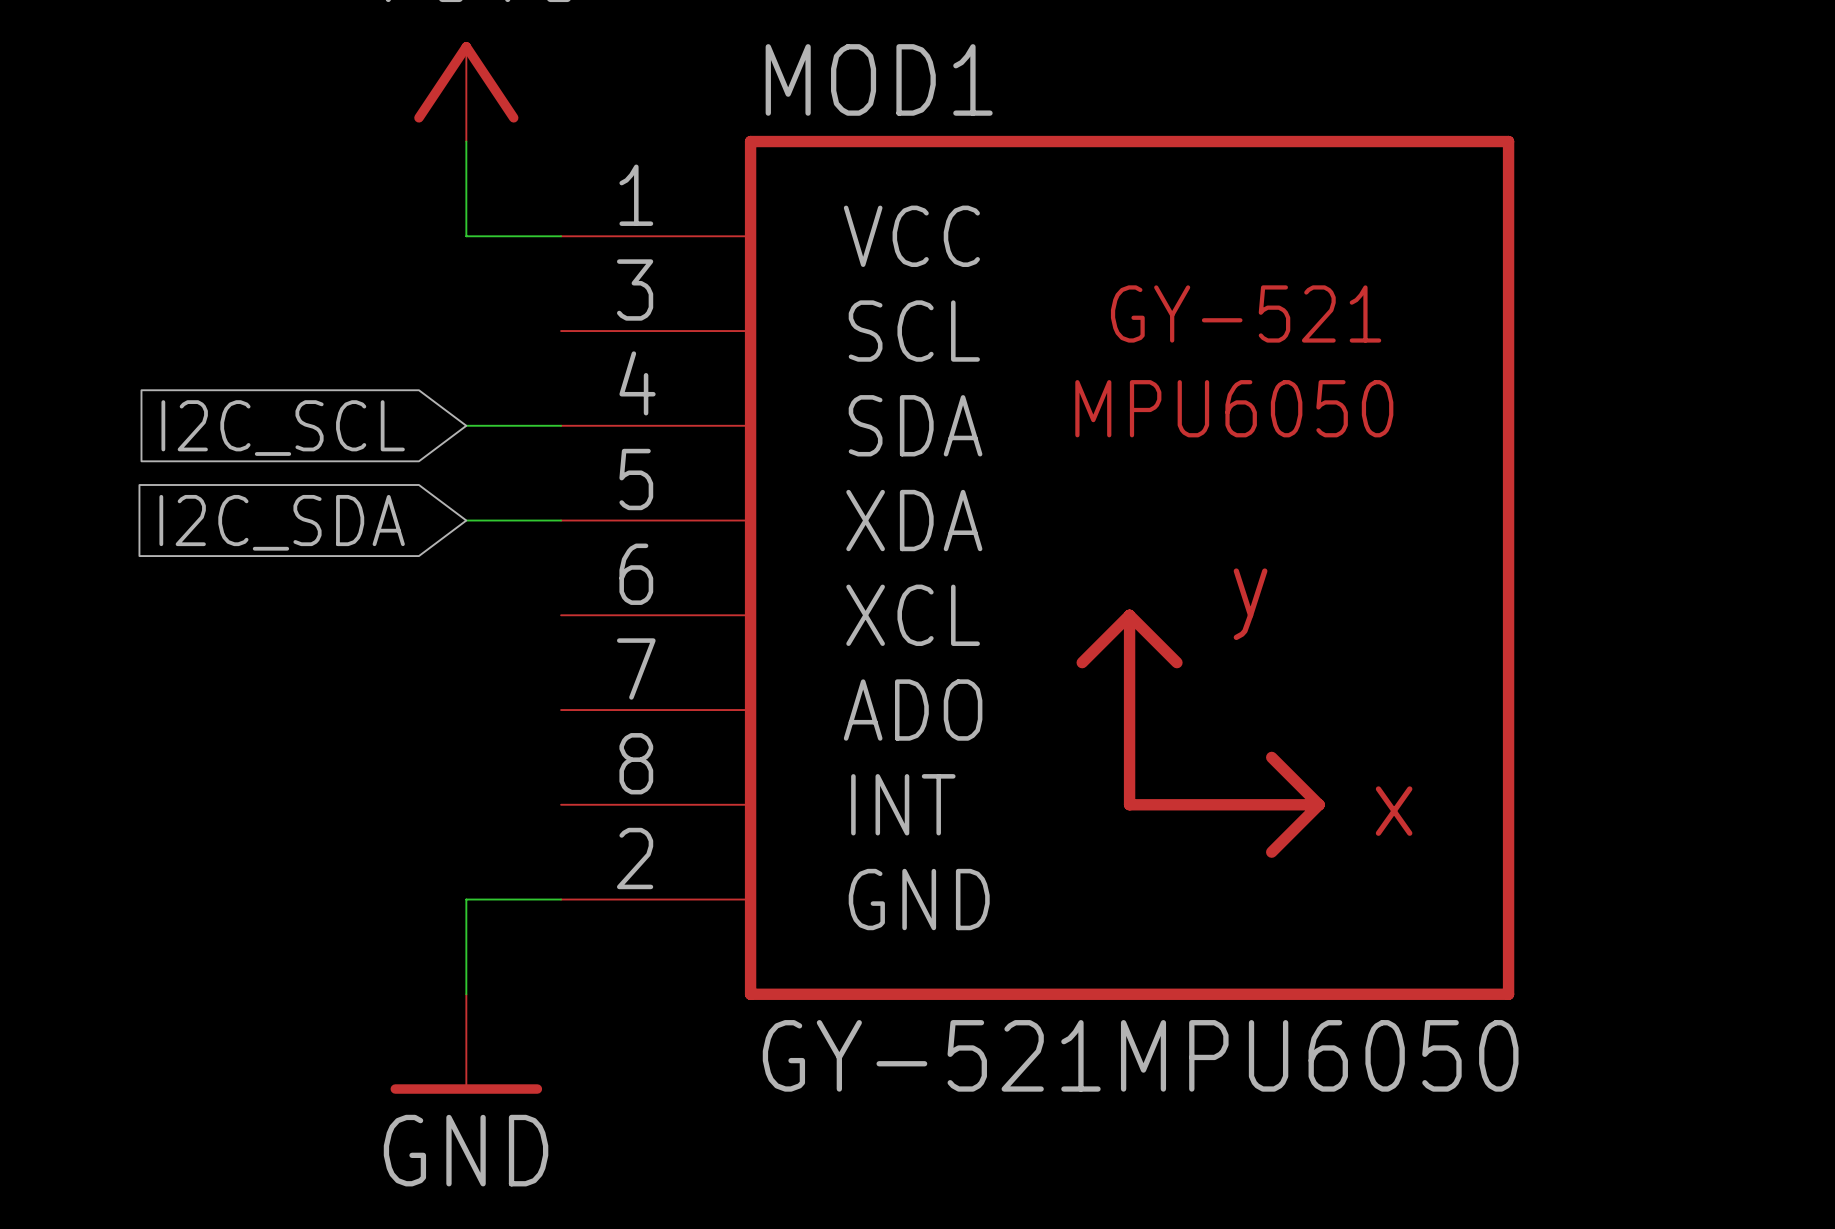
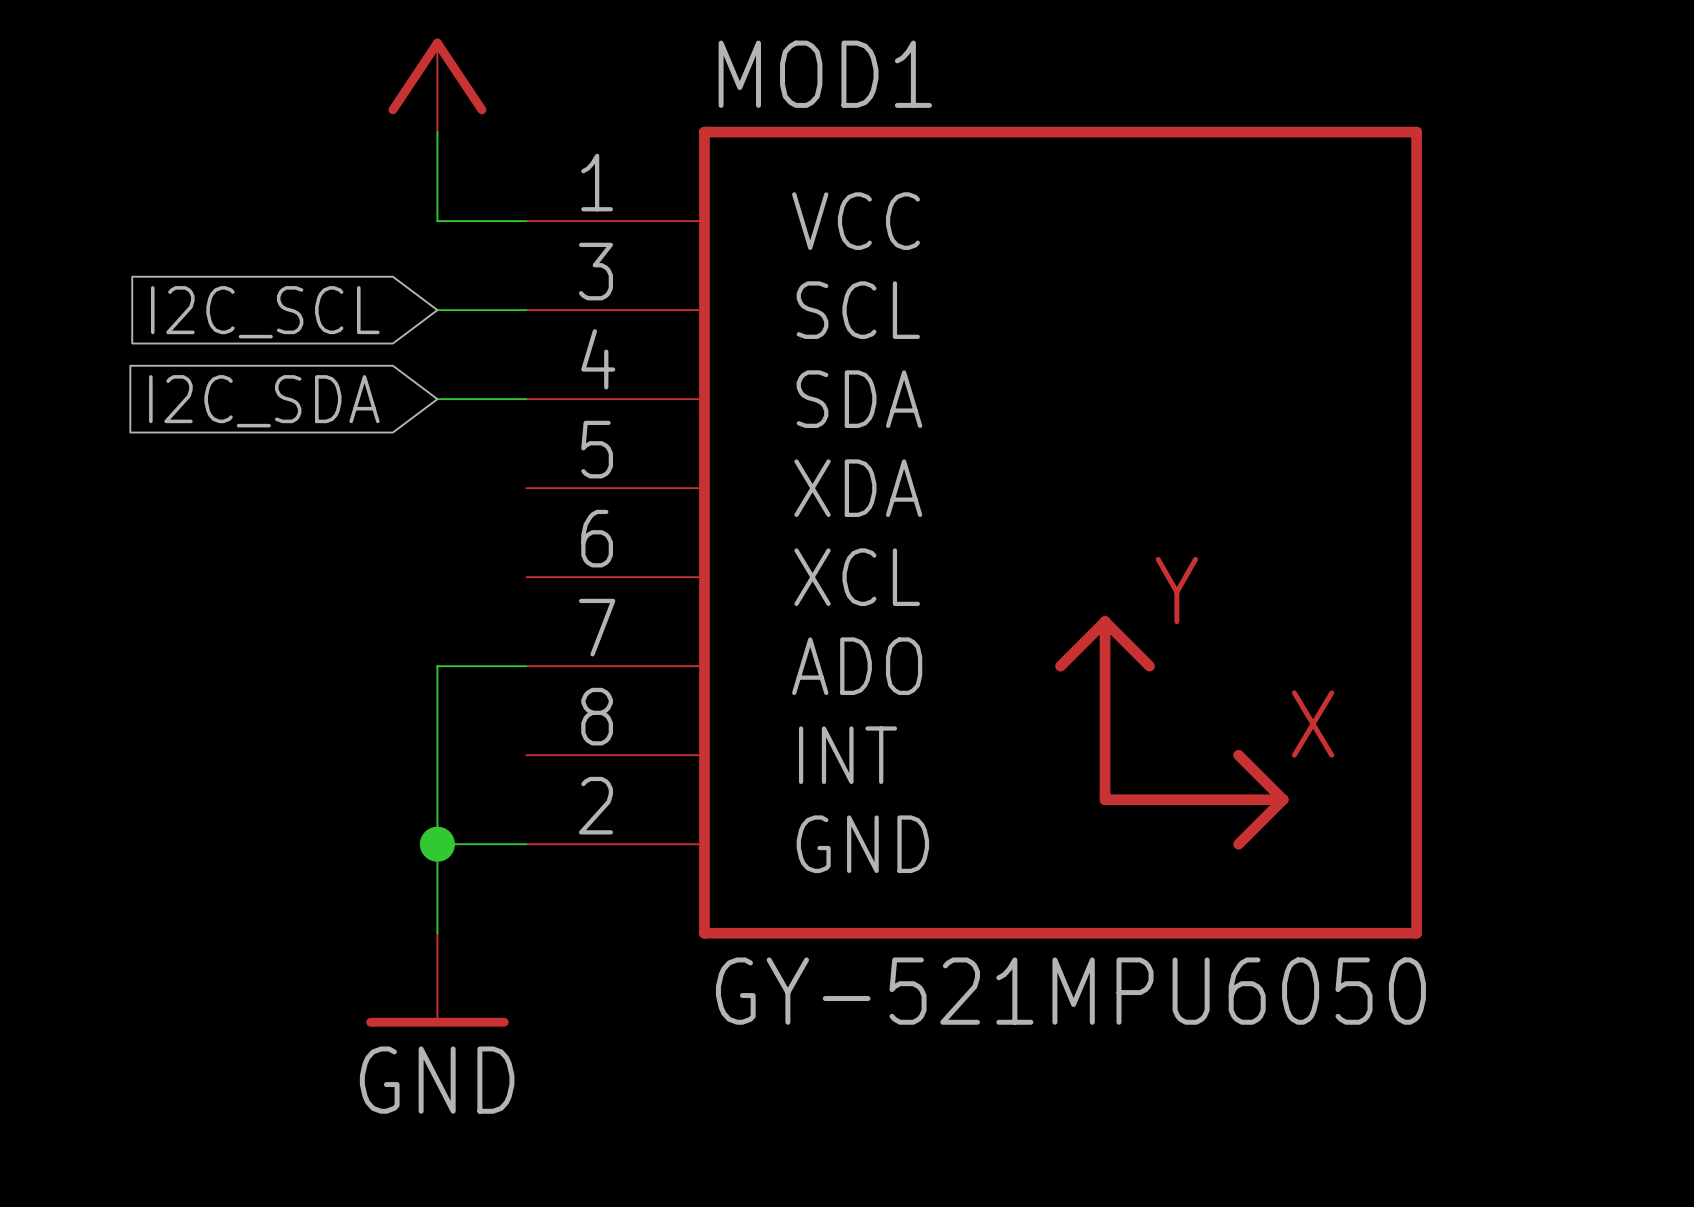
MOD1 symbol: [561, 135, 1515, 1000] -> [526, 126, 1422, 939]
global label: none -> I2C_SCL (265, 312)
global label: I2C_SCL (283, 428) -> I2C_SDA (264, 401)
wire: (466, 520) (561, 520) -> (437, 310) (526, 310)
global label: I2C_SDA (282, 522) -> none
wire: none -> (526, 666) (437, 666) (437, 844)
junction: none -> (437, 844)

